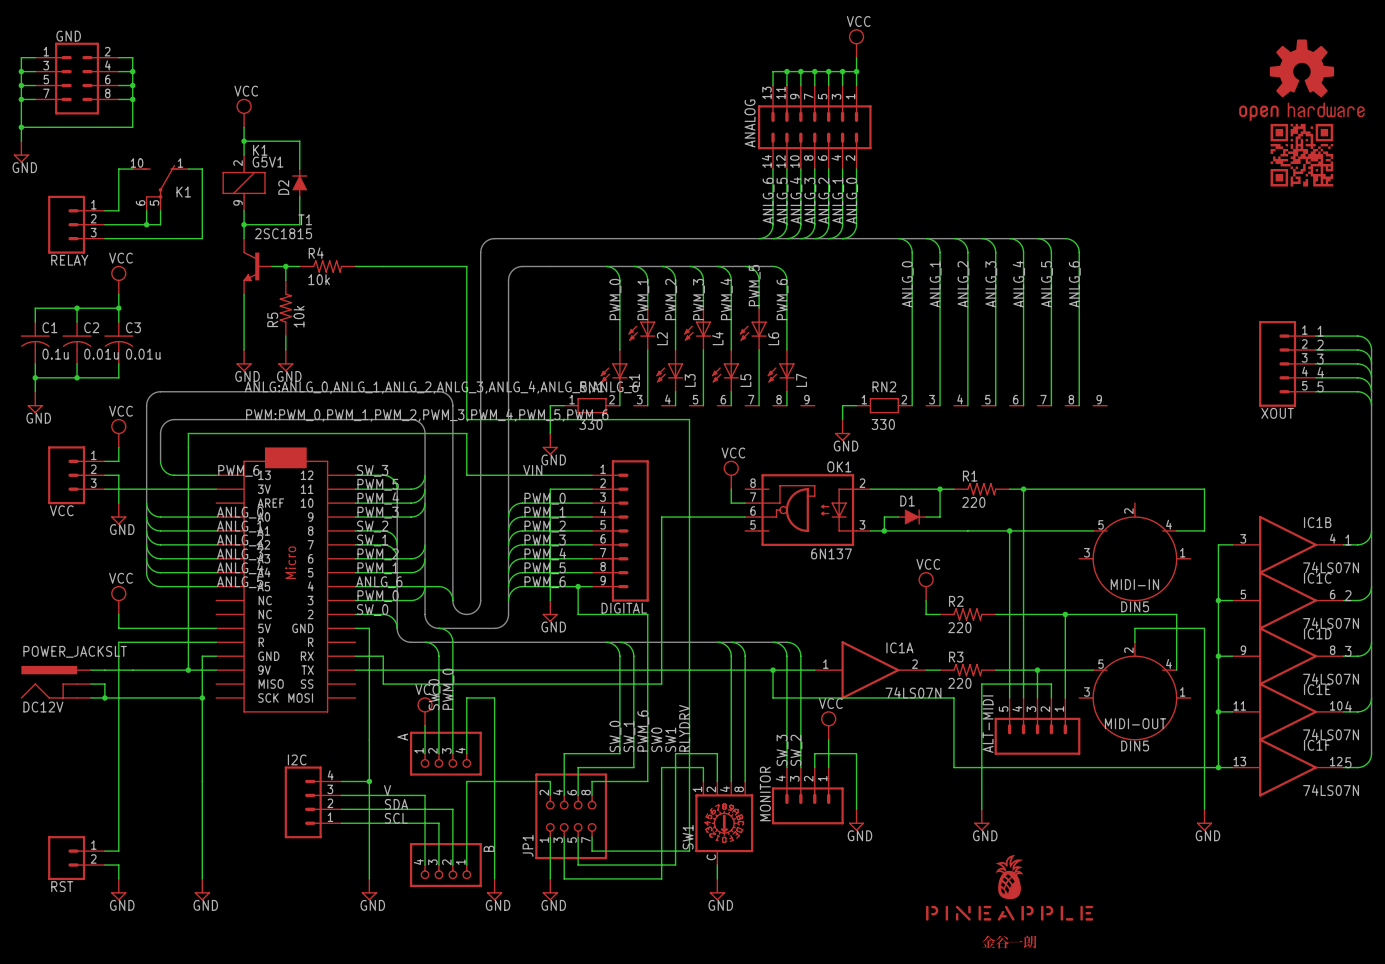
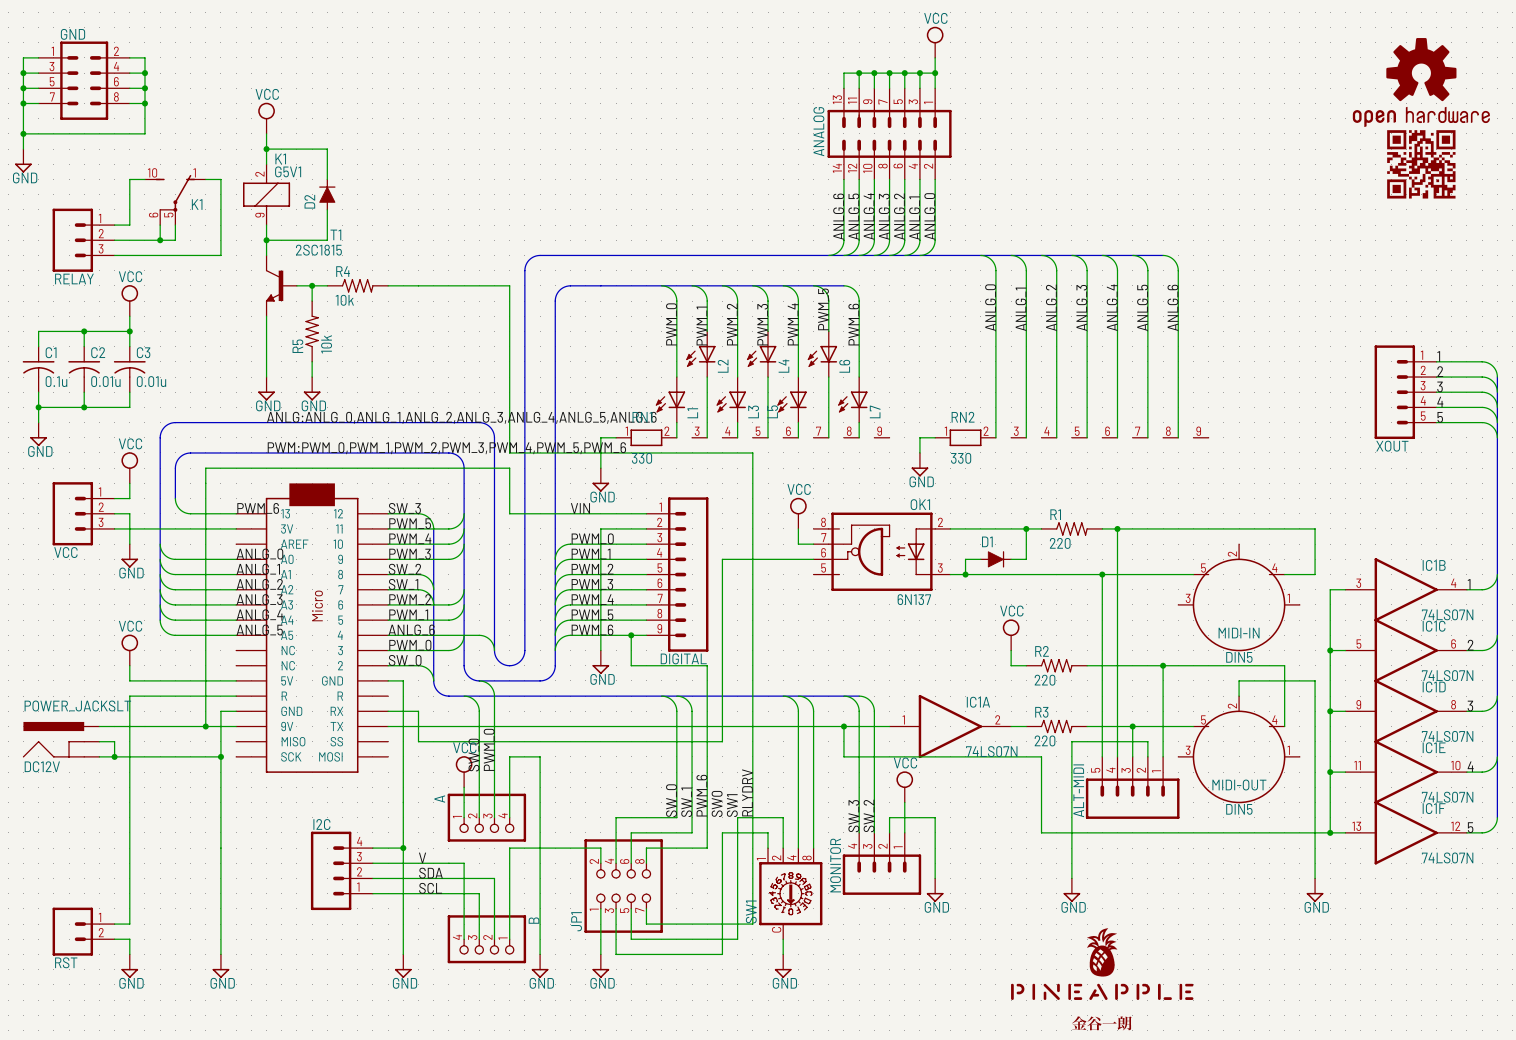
L5 name position: L5 (745, 380) -> L5 (772, 411)

